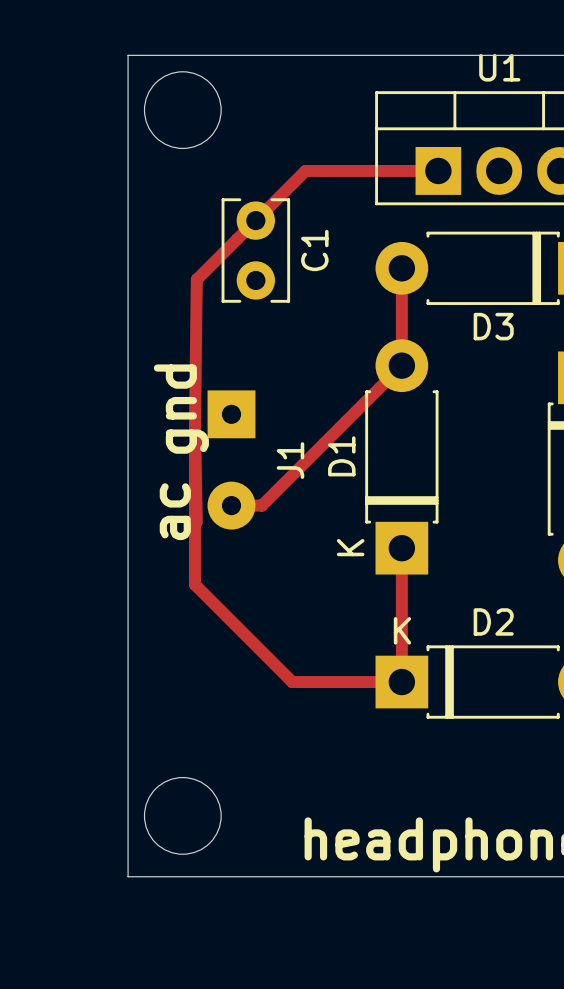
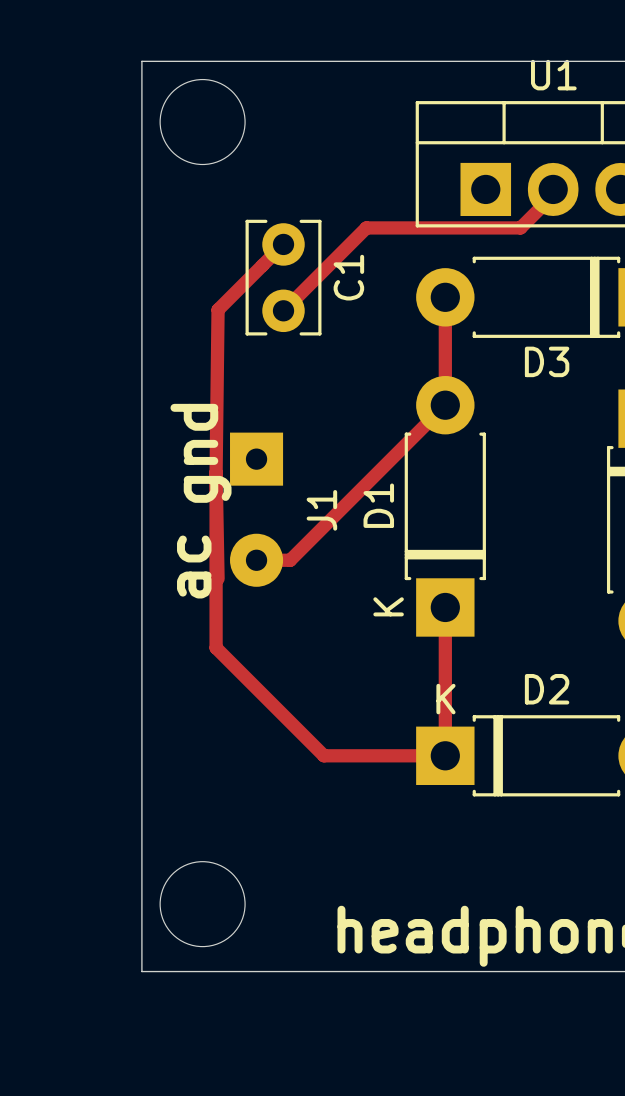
track: (438, 170) (305, 170) (255, 220) -> none
track: none -> (553, 195) (520, 227) (366, 227) (283, 310)

